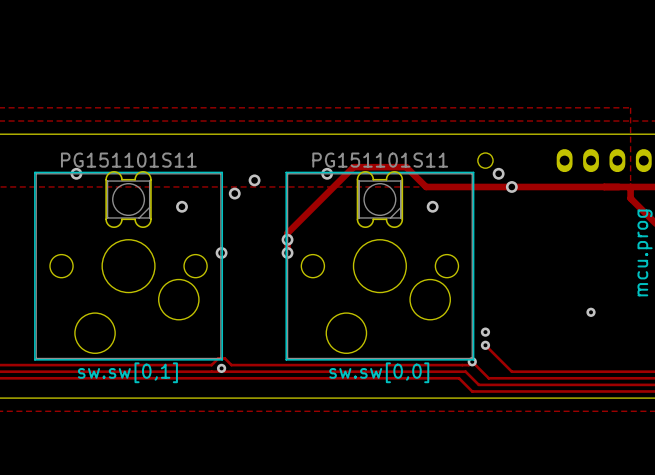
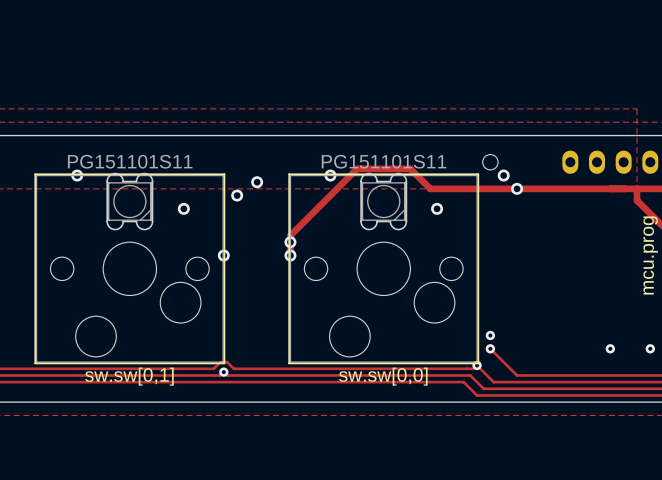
via: (591, 312) -> none
via: none -> (610, 348)
via: none -> (650, 348)

